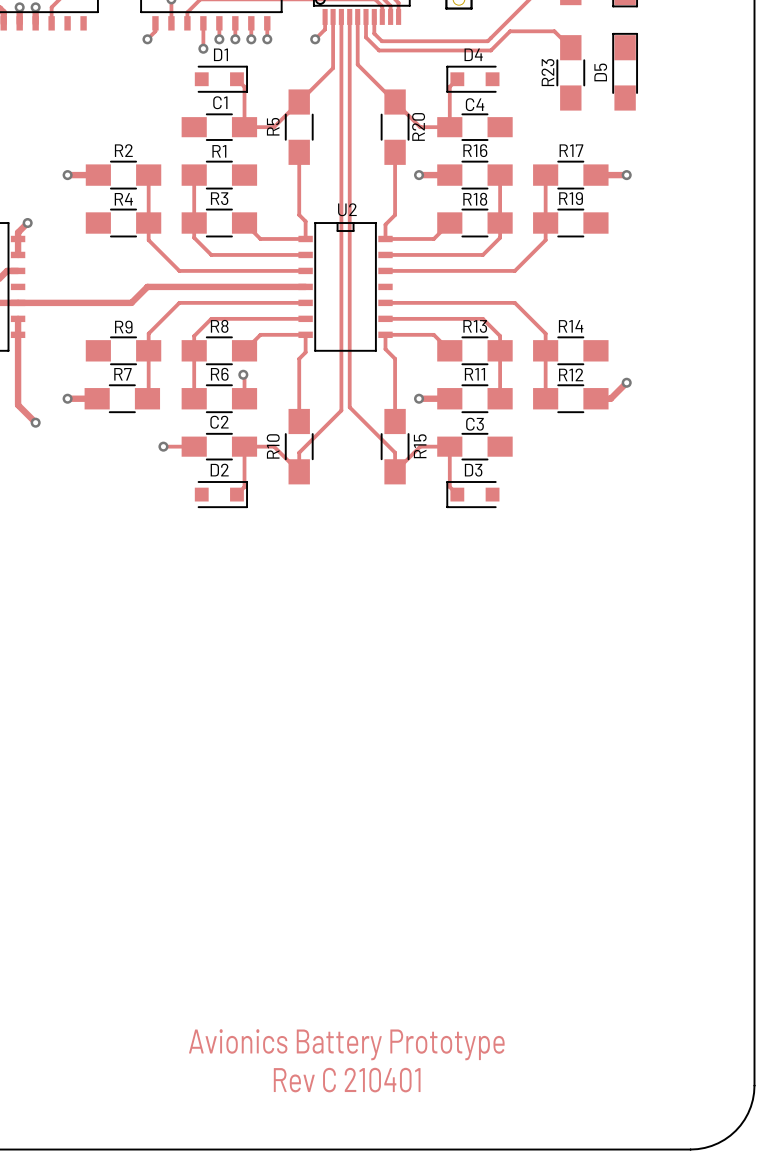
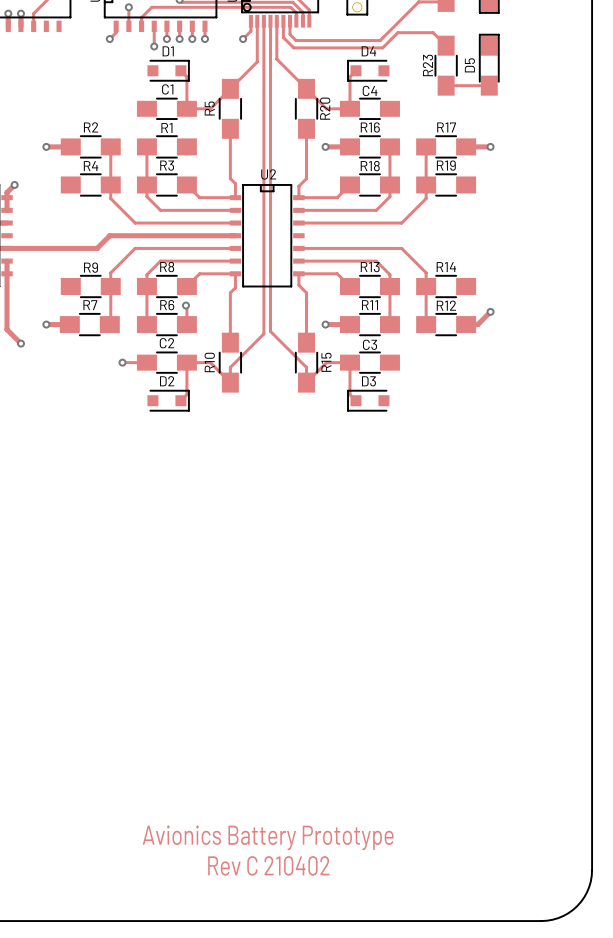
track: none -> (446, 85) (489, 85)
text: Rev C 210401 (347, 1080) -> Rev C 210402 (268, 865)

